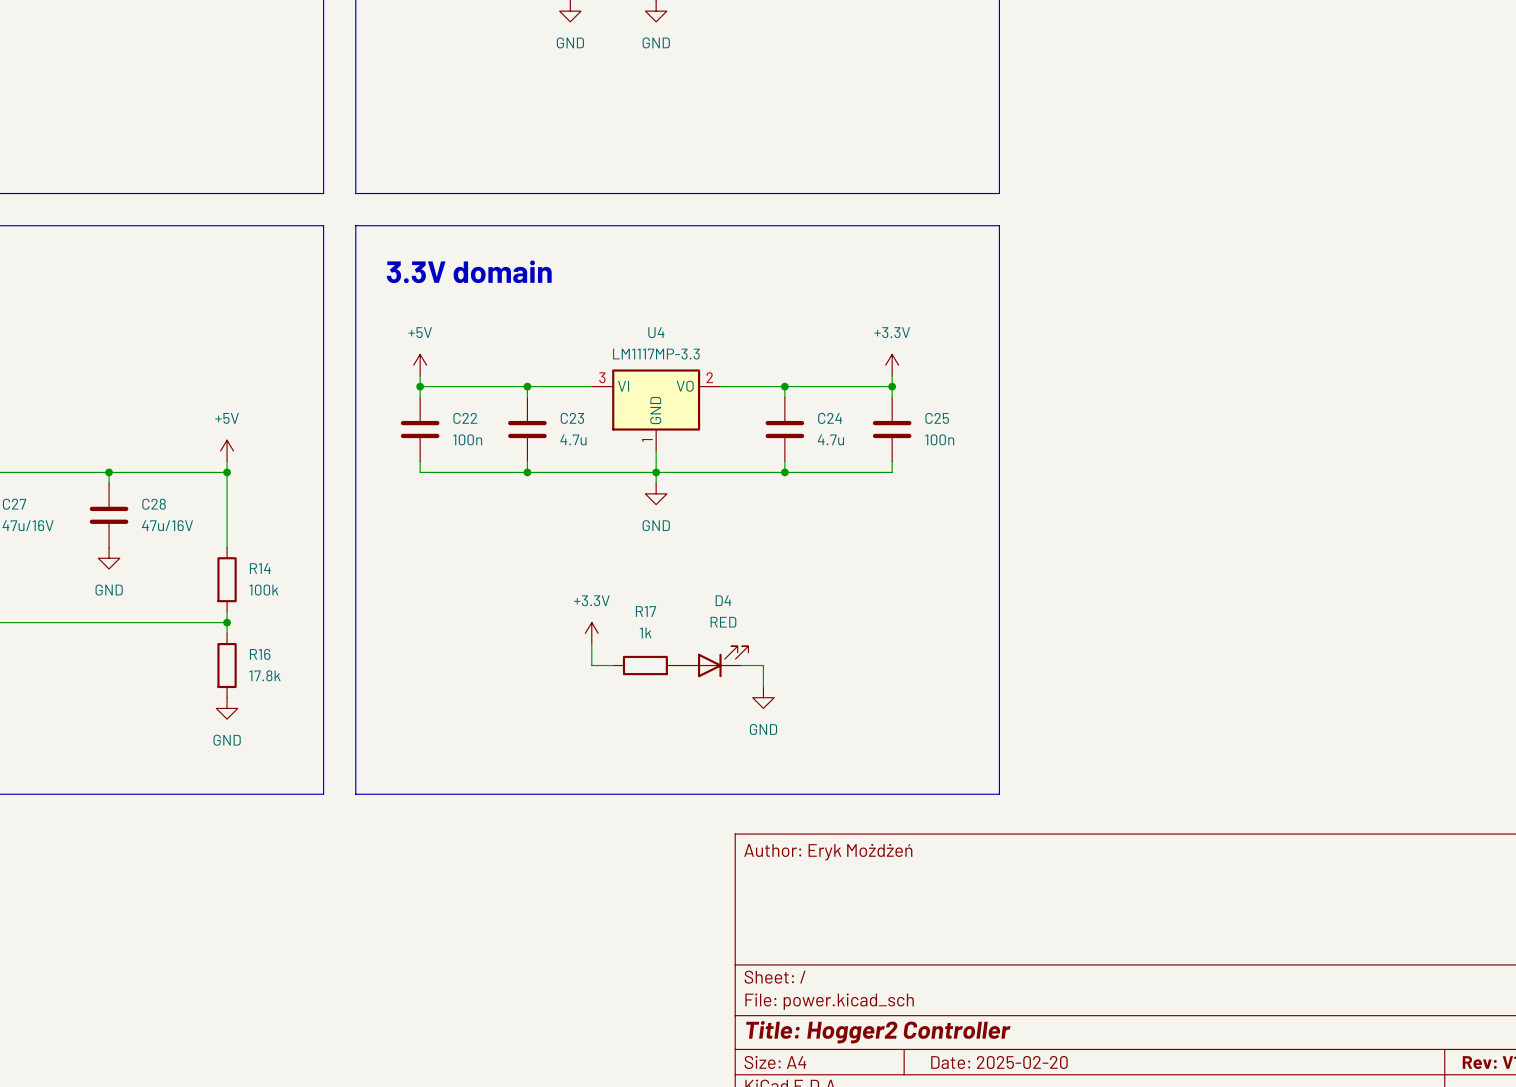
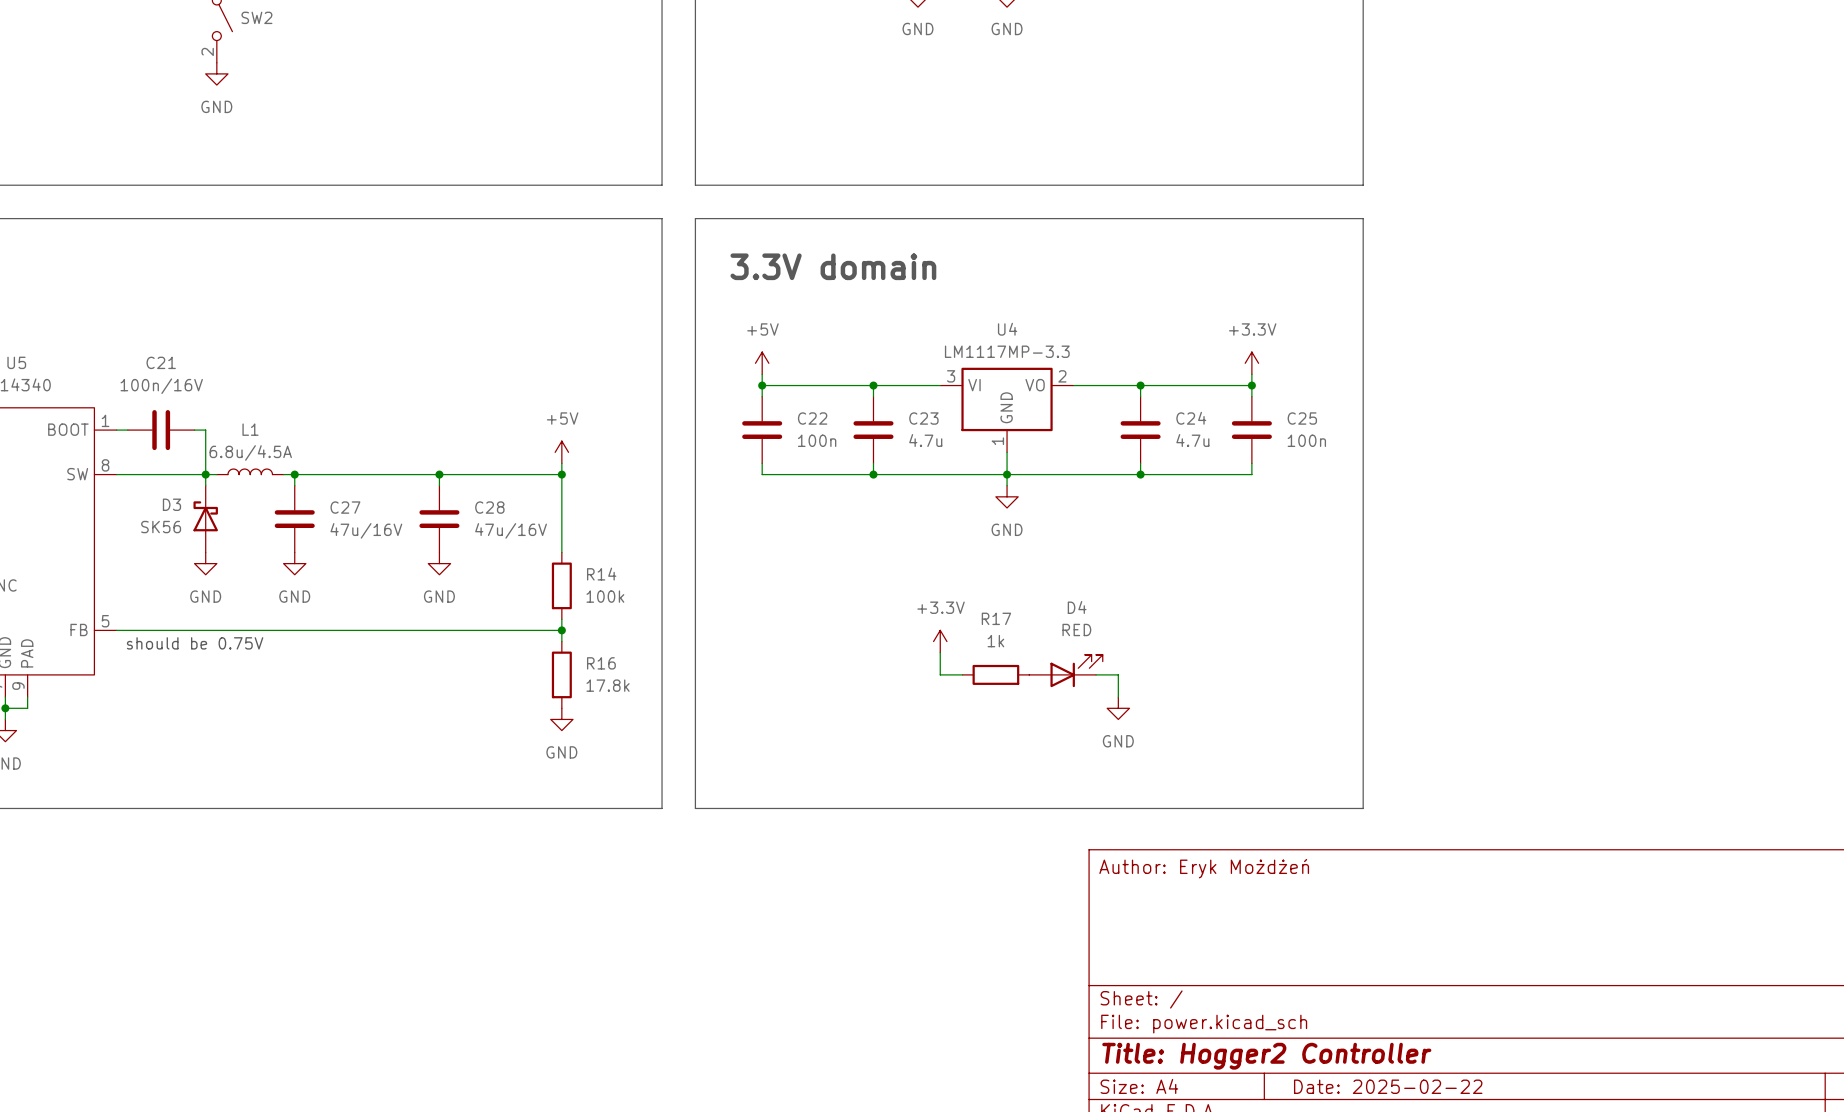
title block: Date: 2025-02-20 (999, 1062) -> Date: 2025-02-22 (1388, 1086)

